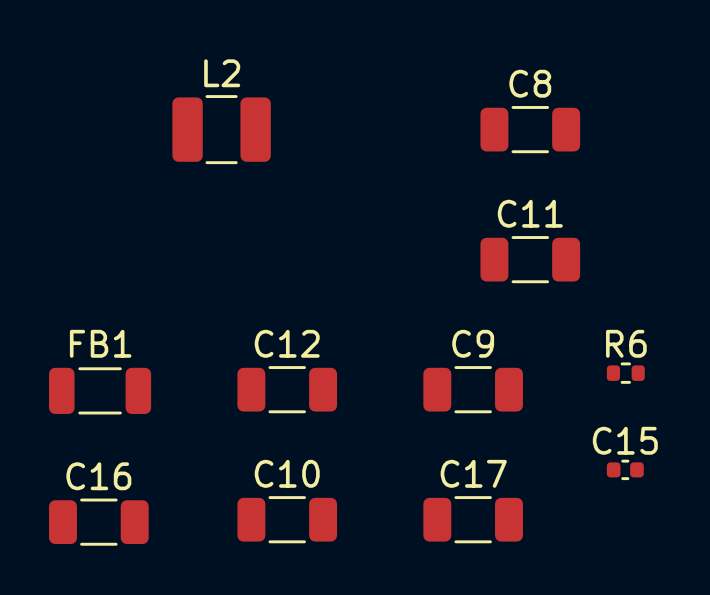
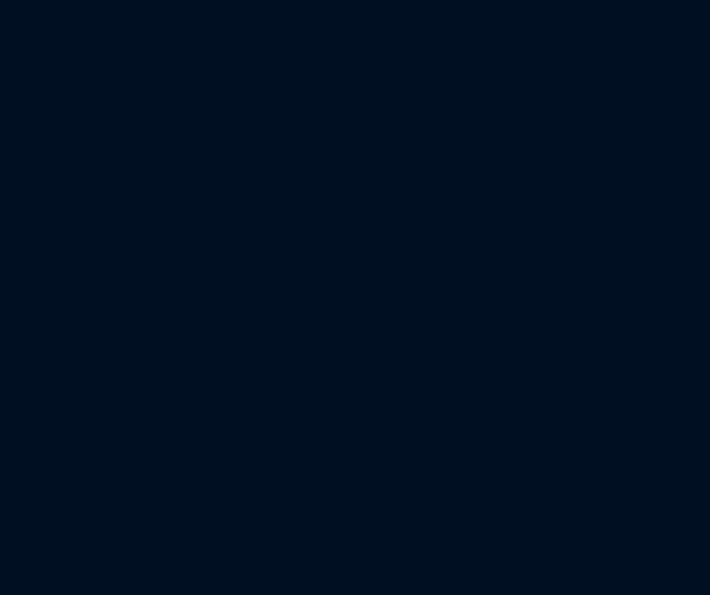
L2: (221, 129) -> none
C8: (530, 129) -> none
C11: (530, 259) -> none
R6: (625, 373) -> none
C12: (287, 389) -> none
C9: (473, 389) -> none
FB1: (100, 390) -> none
C15: (625, 469) -> none
C10: (287, 519) -> none
C17: (473, 519) -> none
C16: (98, 522) -> none

